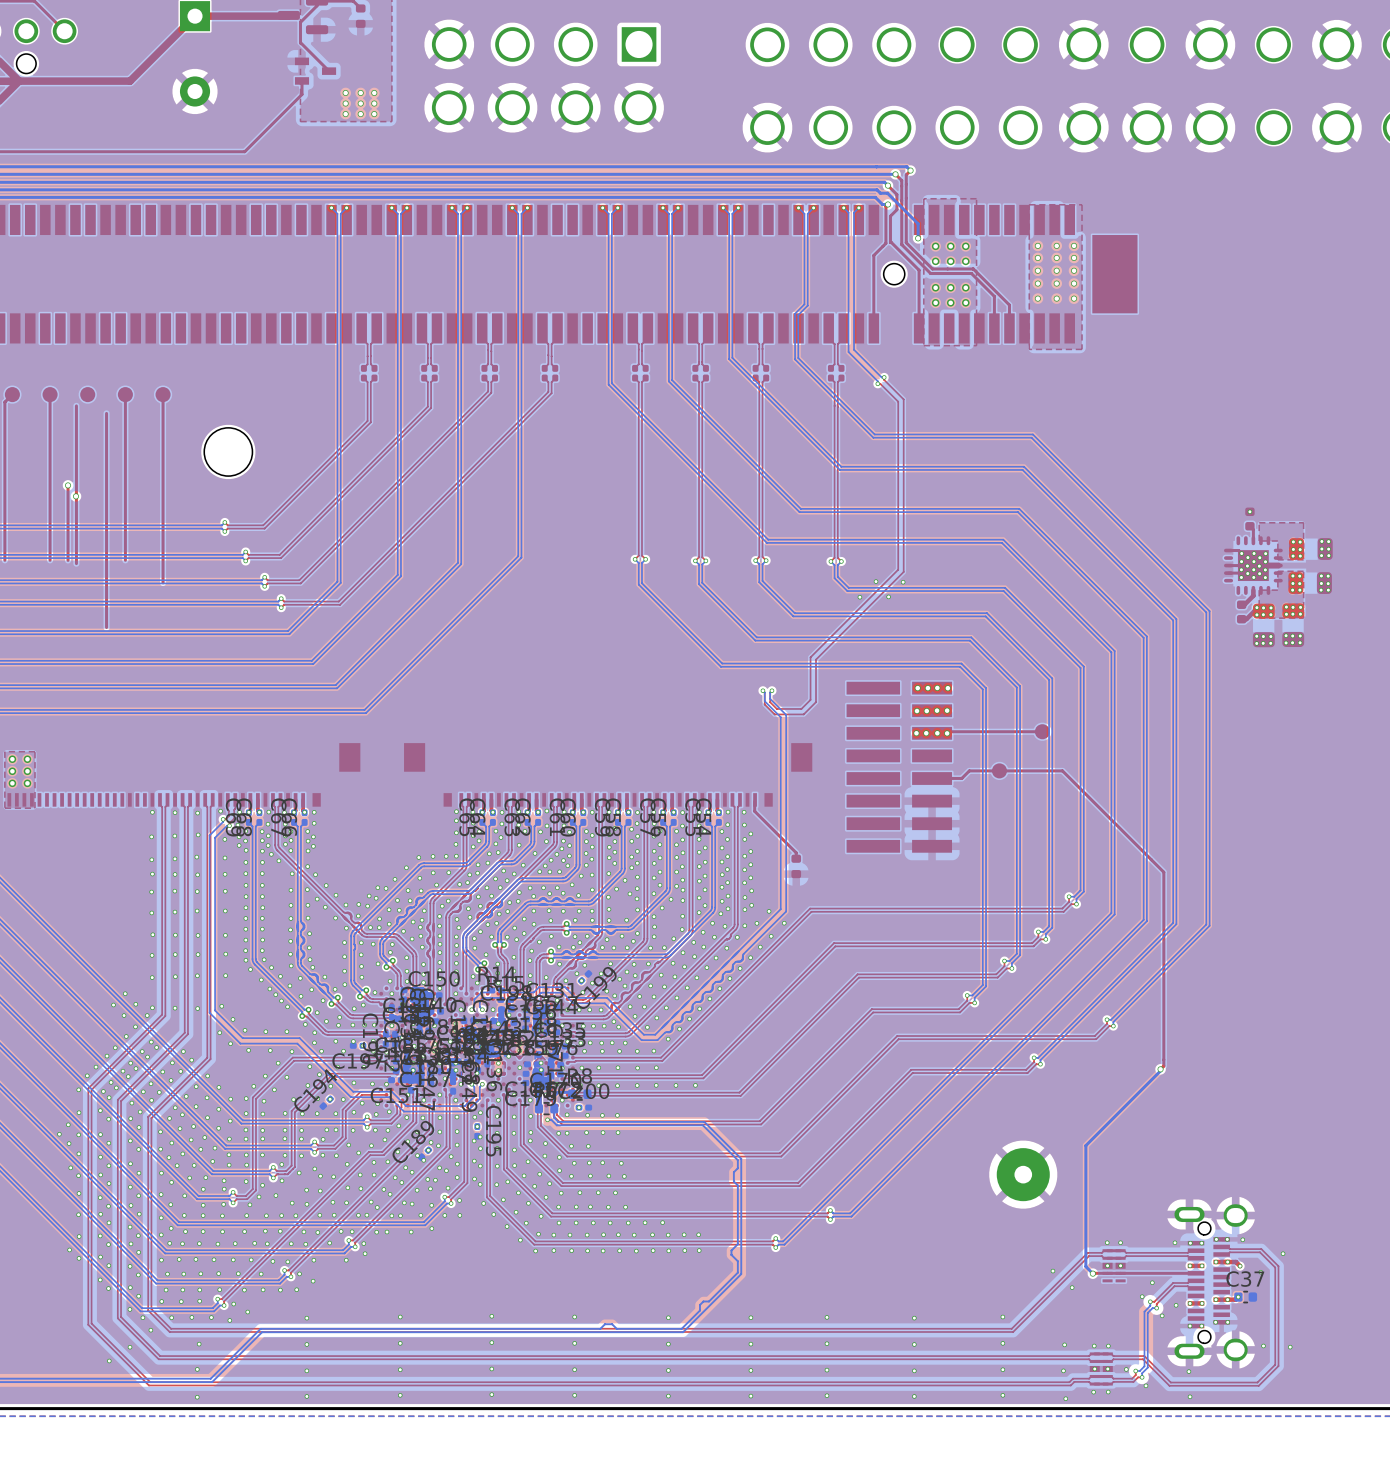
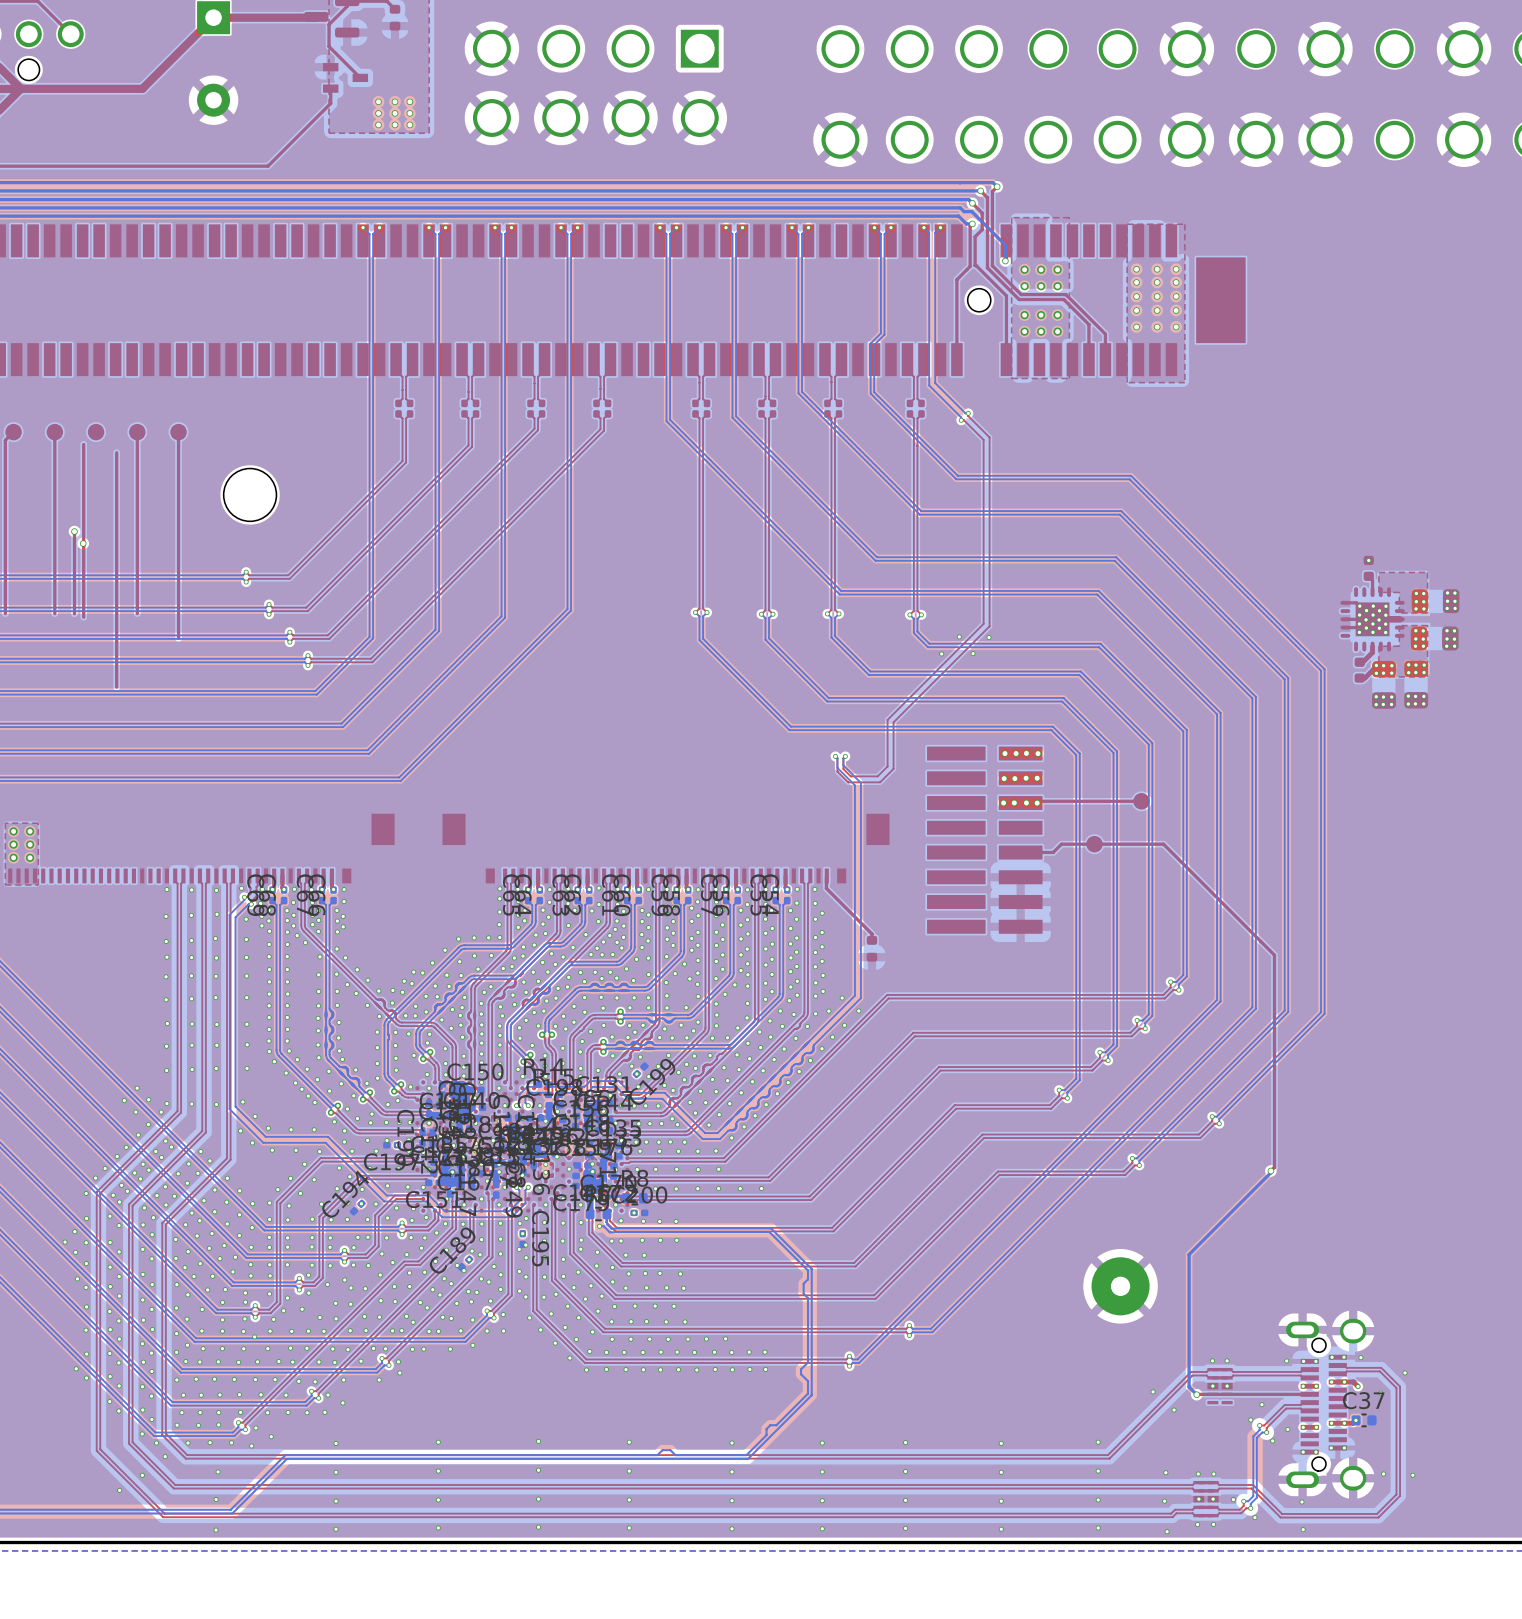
via: none -> (254, 1336)

